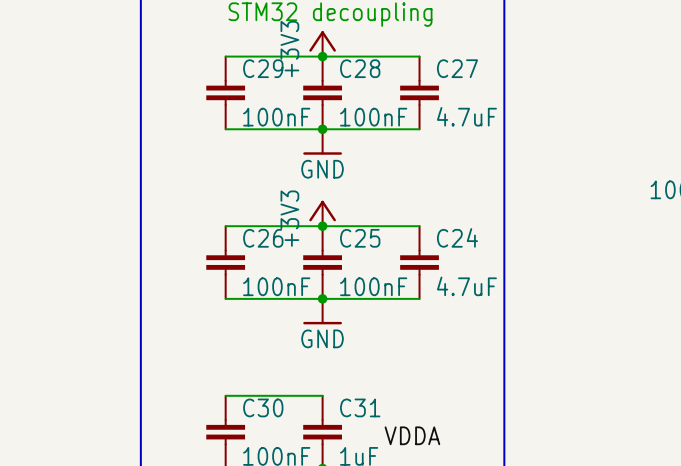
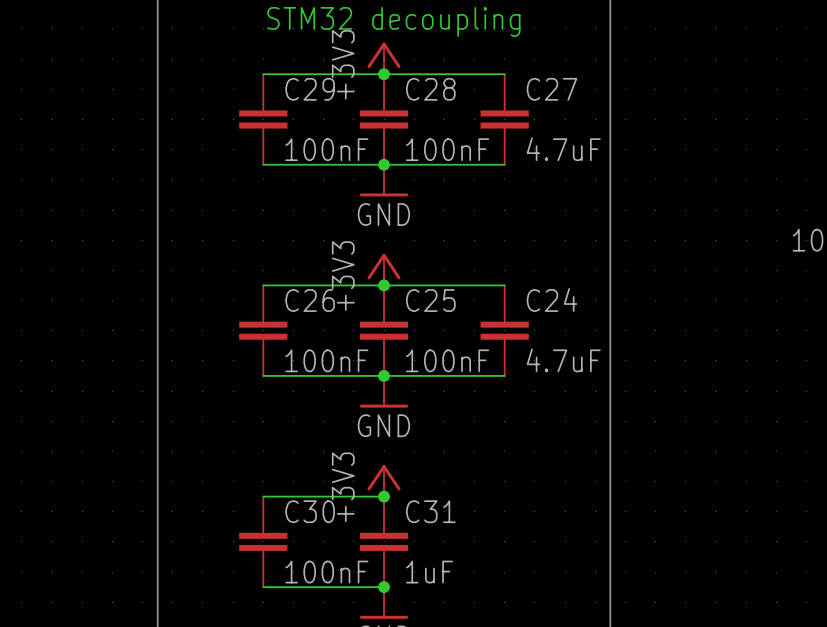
power symbol: none -> +3V3 (384, 480)
junction: none -> (384, 496)
label: VDDA (412, 435) -> none

